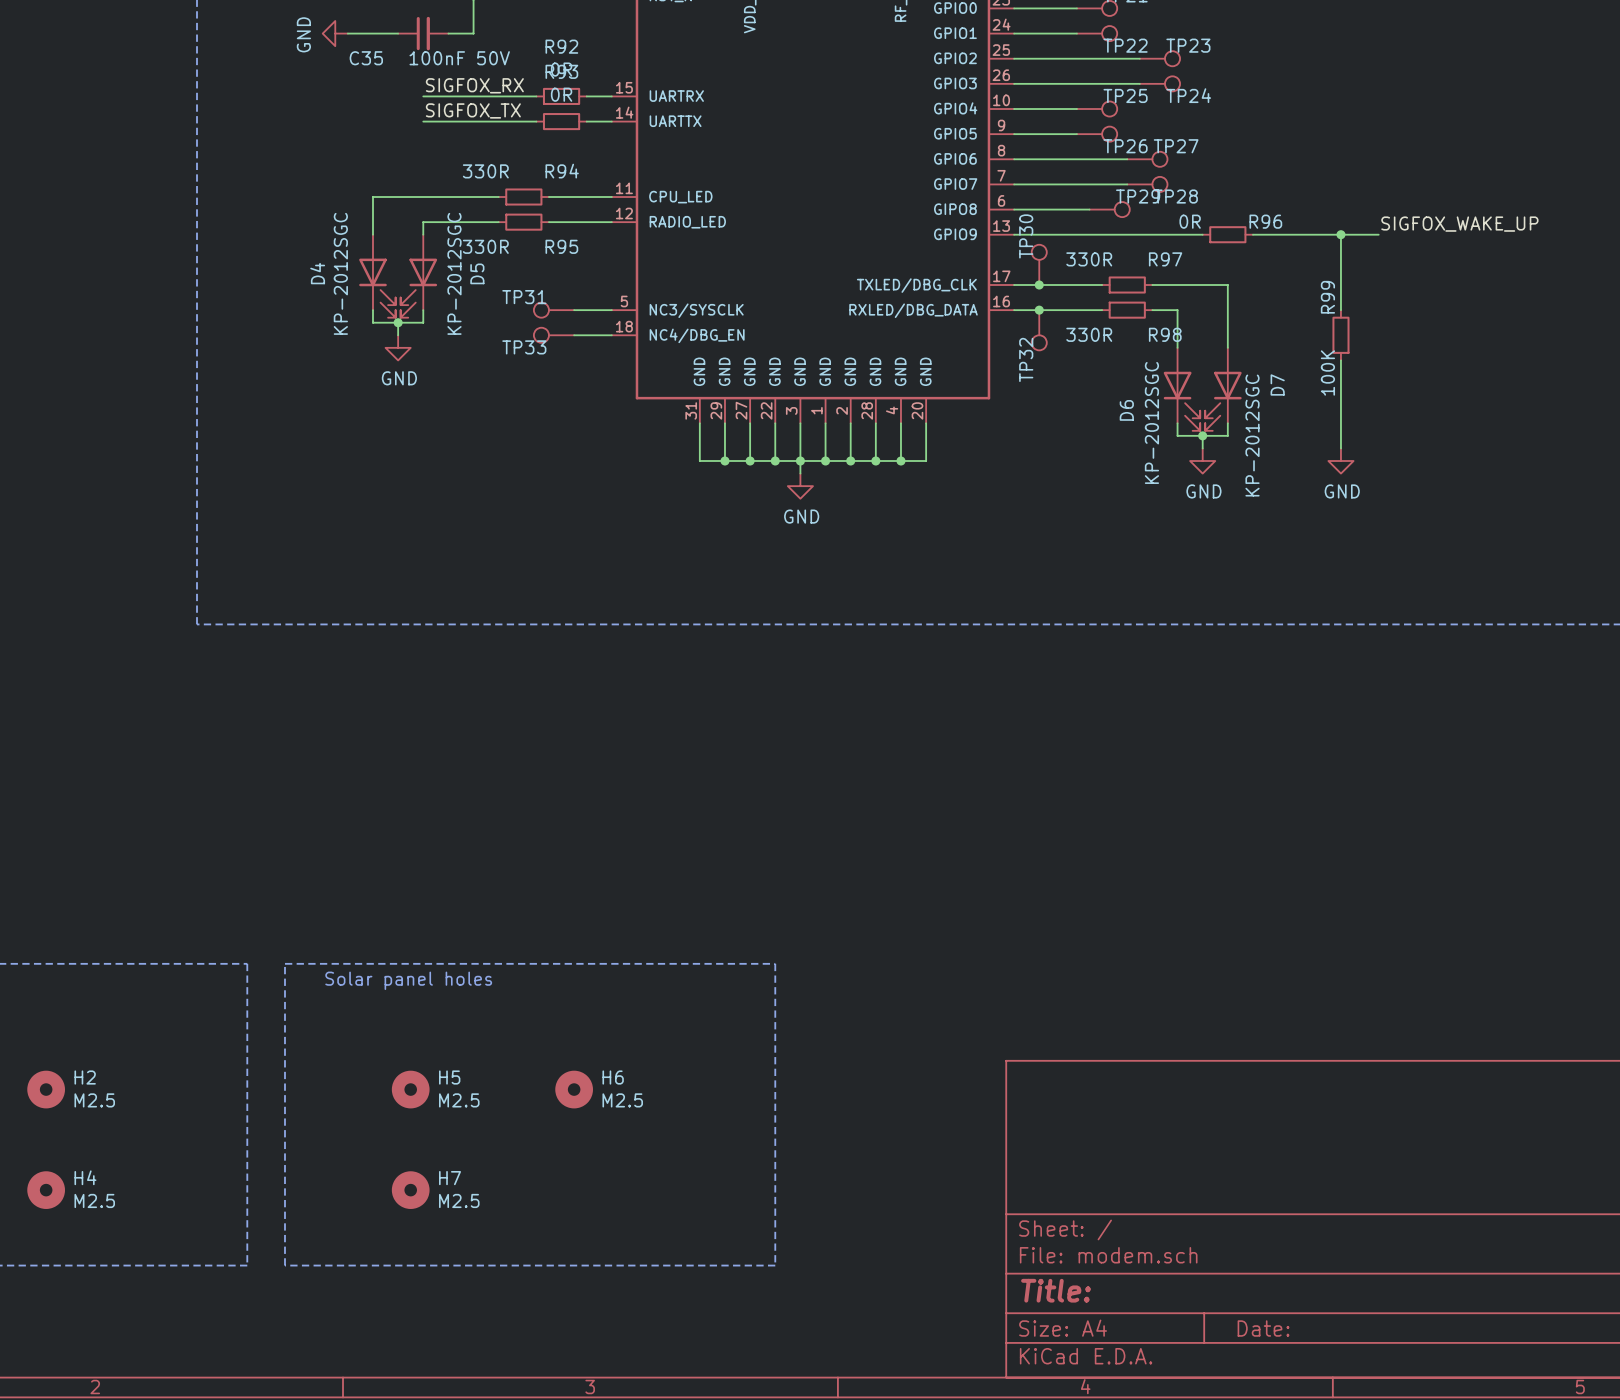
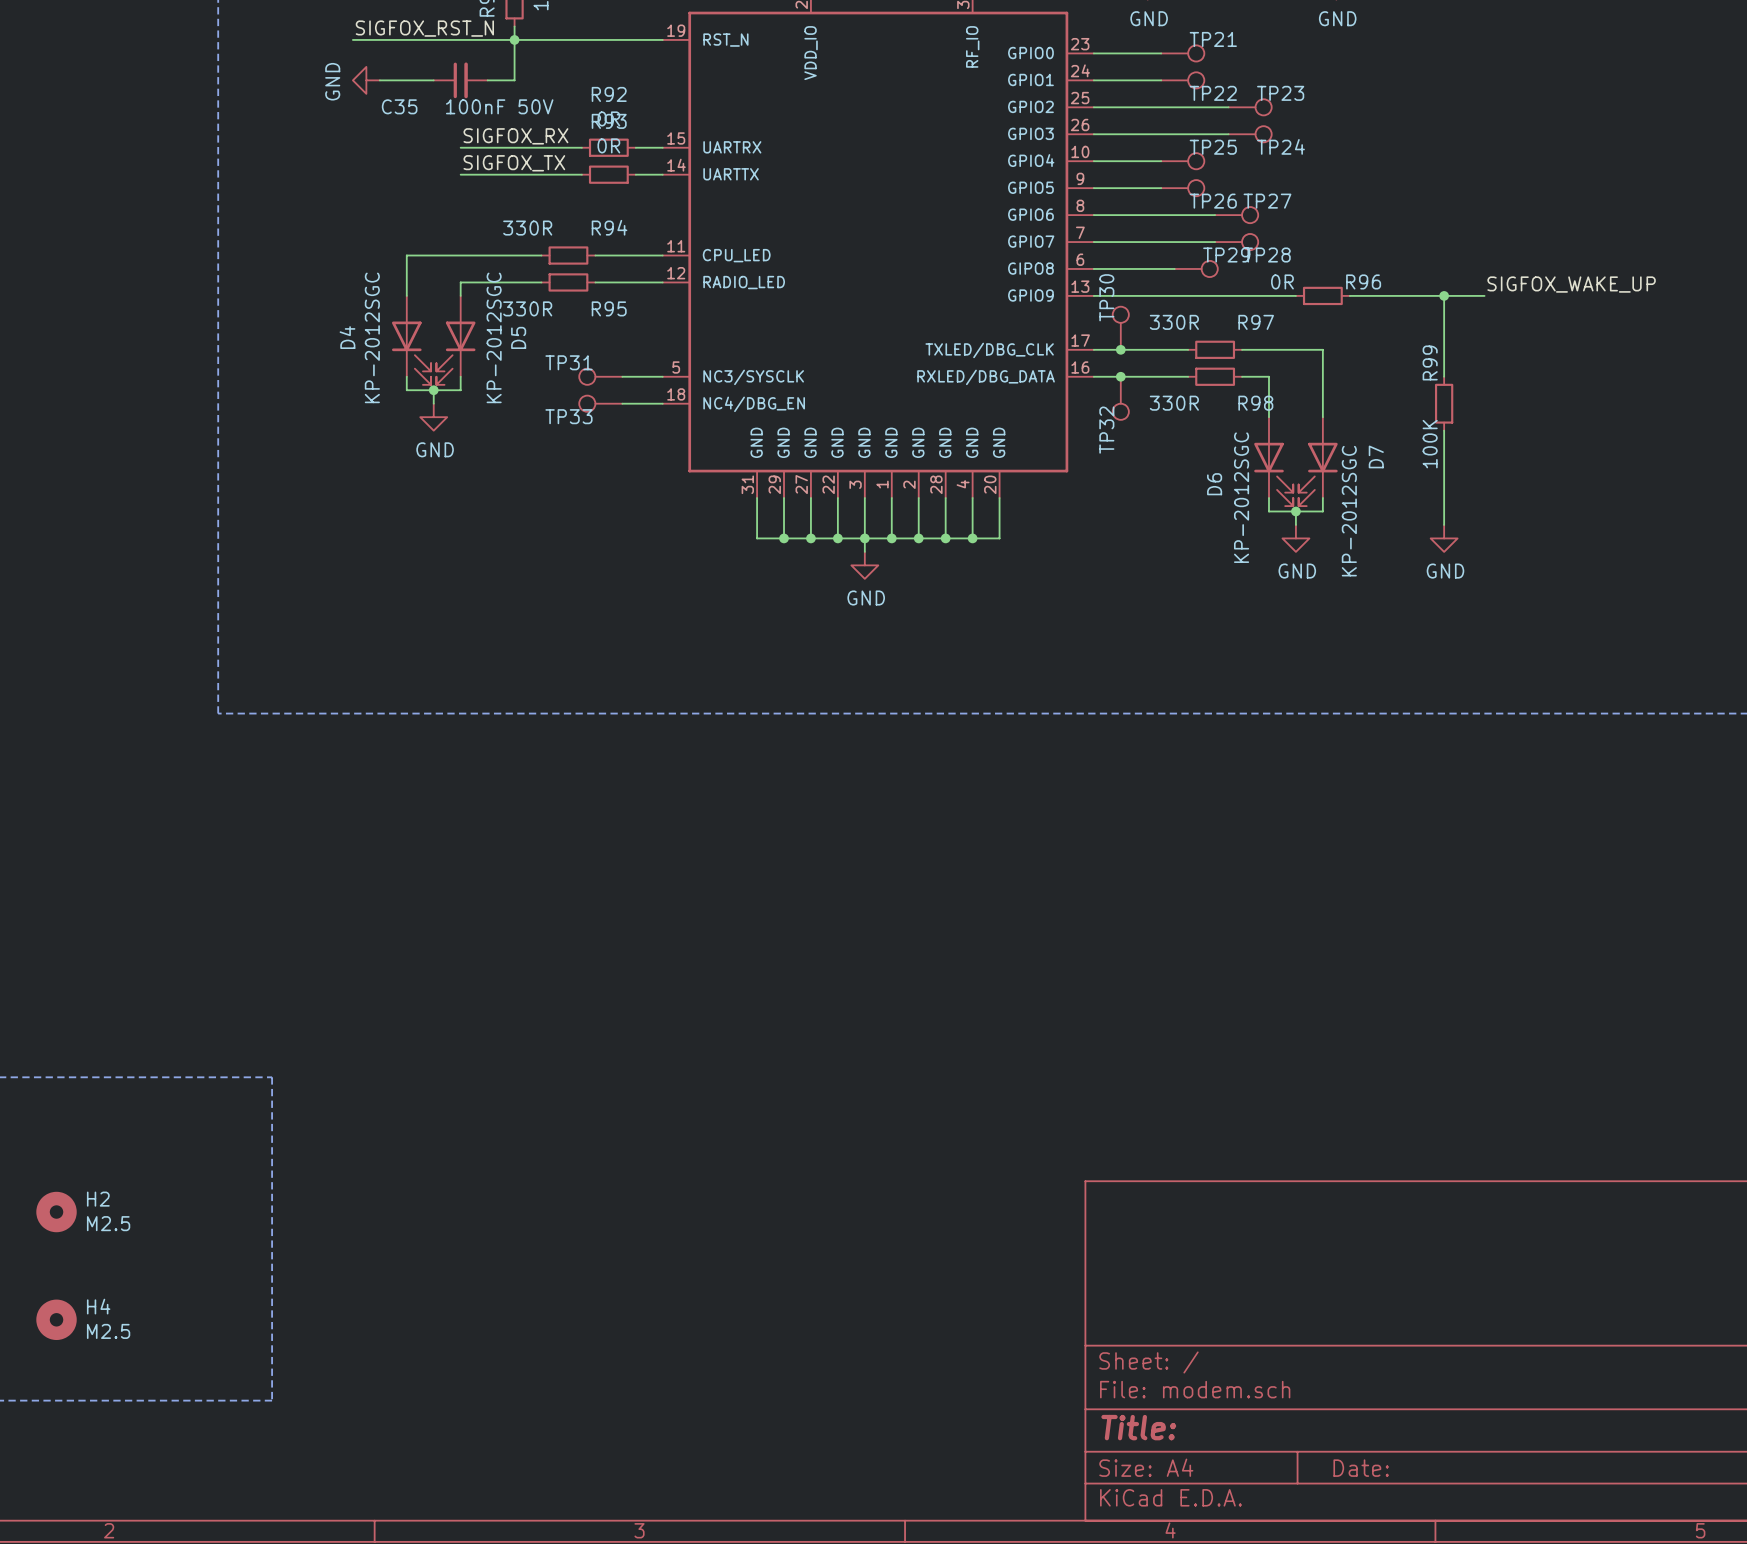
line: (284, 963) (775, 963) (775, 1265) (284, 1265) (284, 963) -> none
text: Solar panel holes (408, 980) -> none
H5: M2.5 (410, 1089) -> none
H6: M2.5 (574, 1089) -> none
H7: M2.5 (410, 1190) -> none

